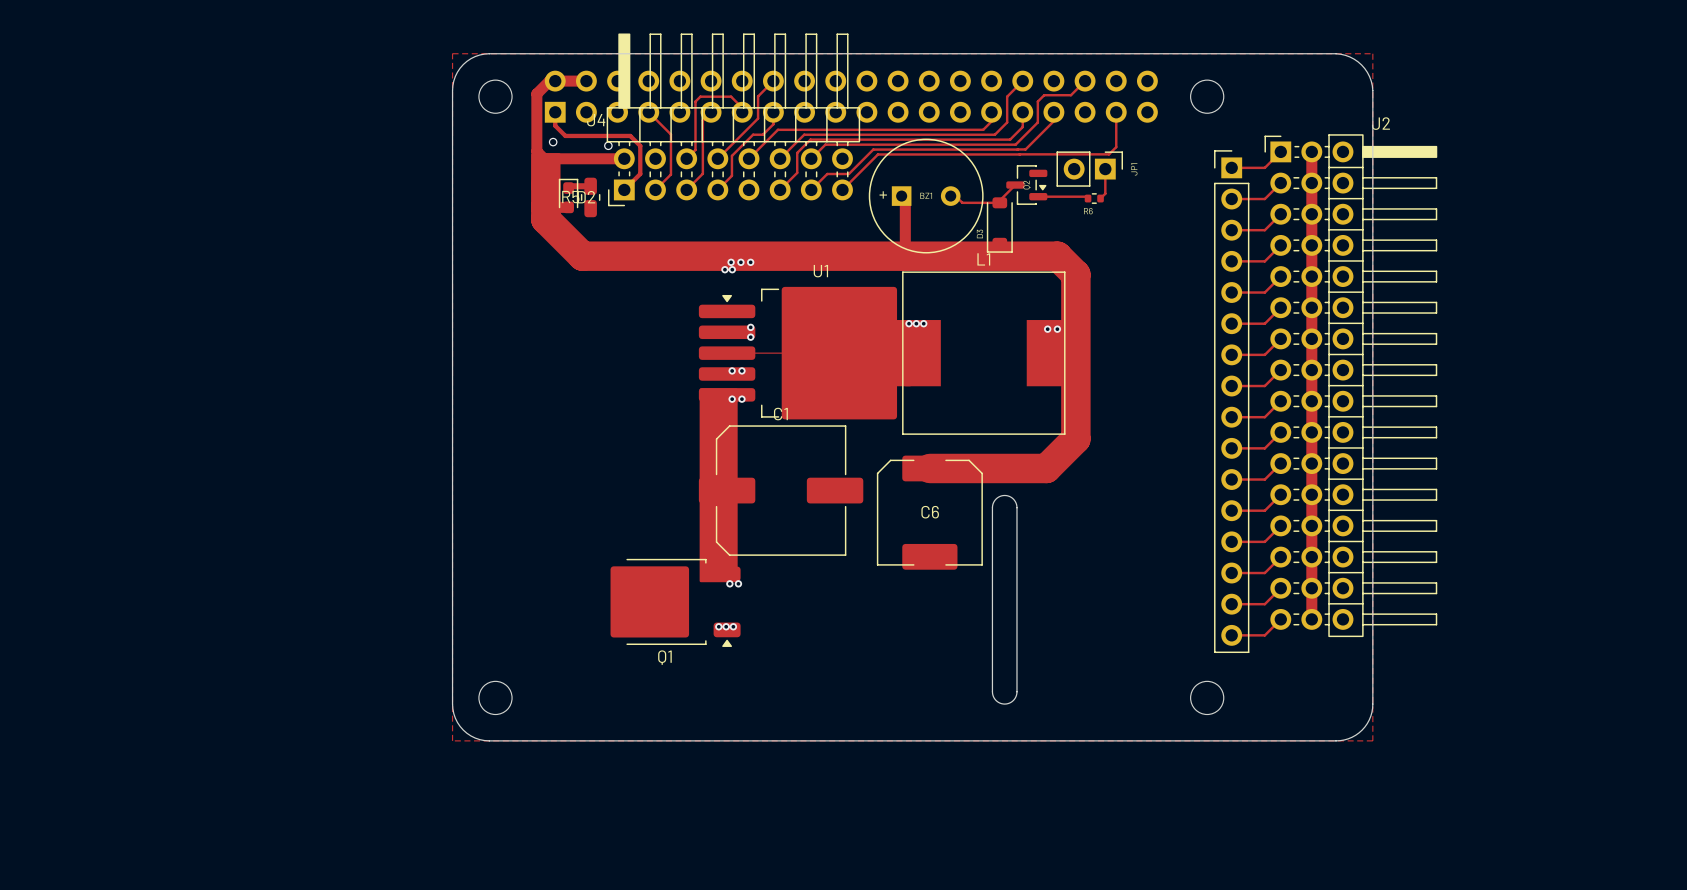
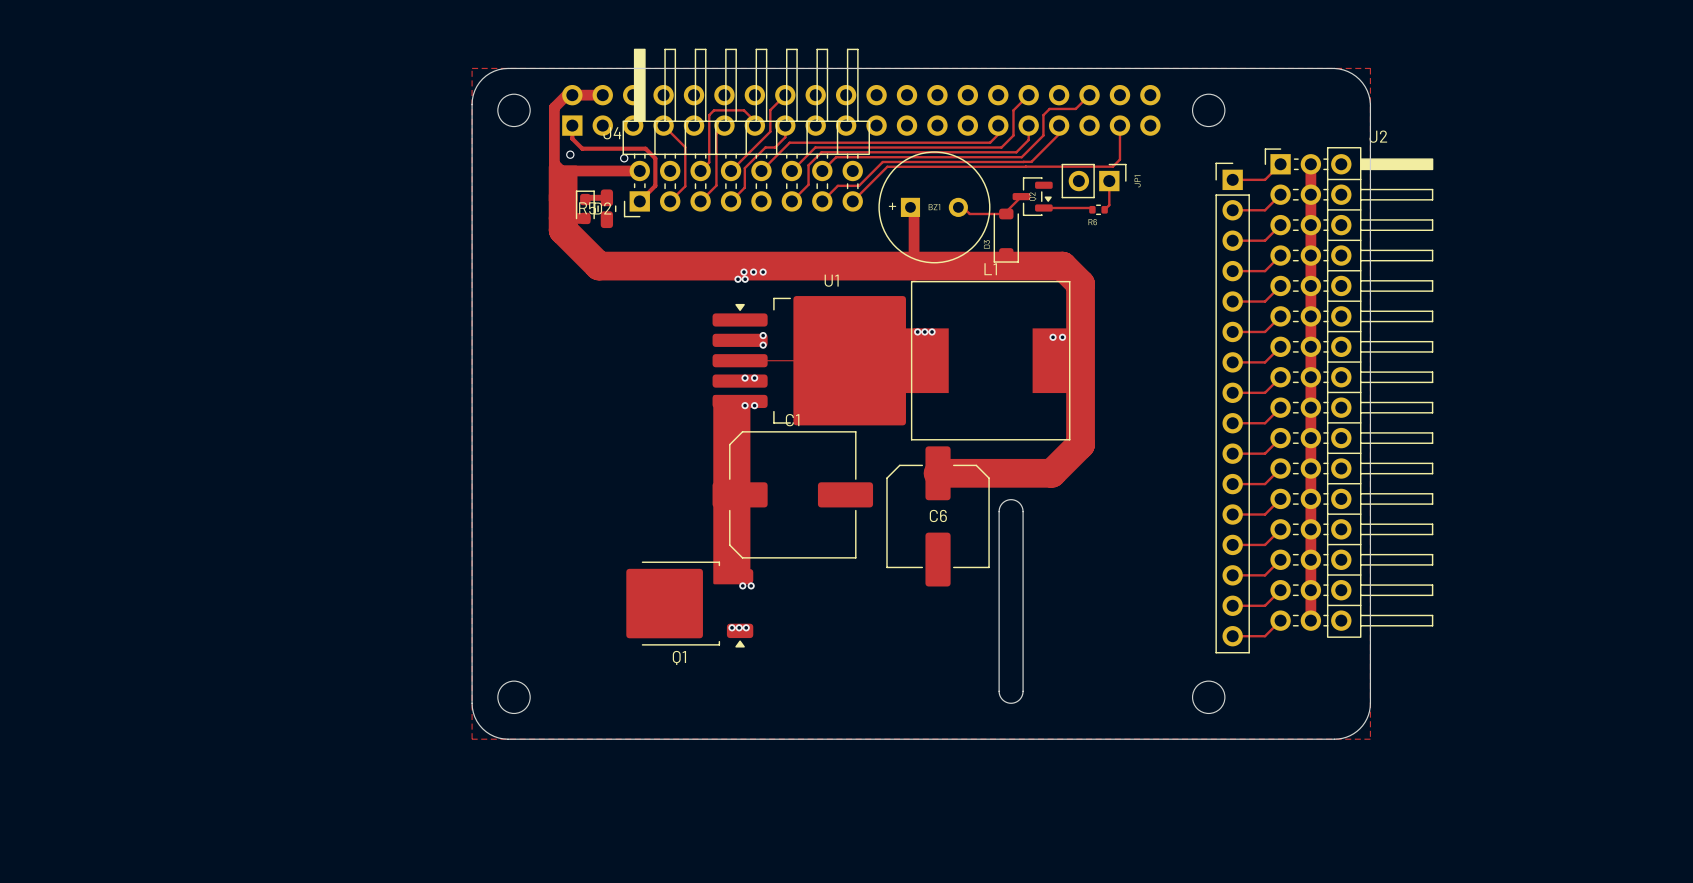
C6 footprint: [876, 455, 983, 570] -> [886, 446, 990, 587]

